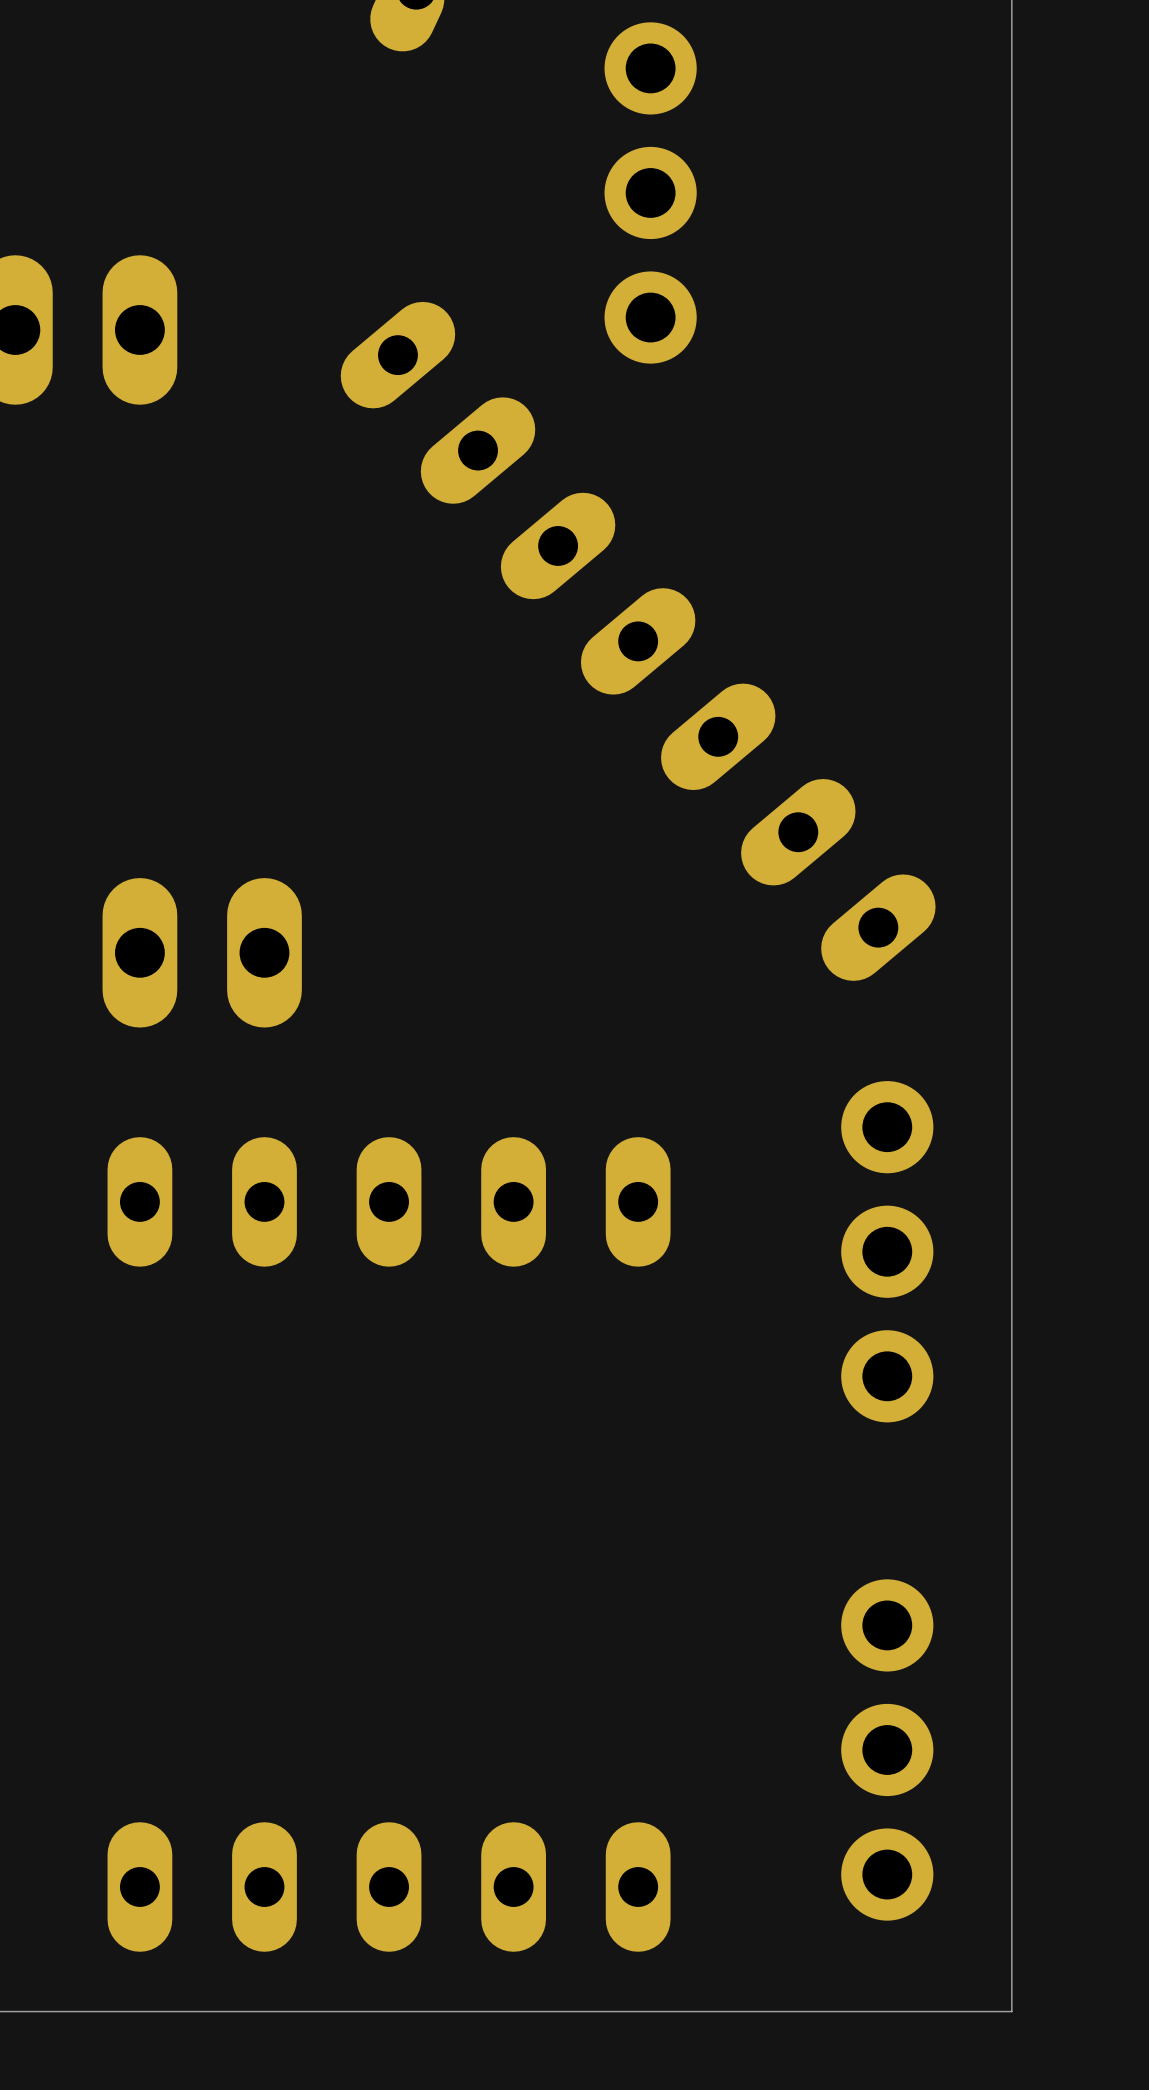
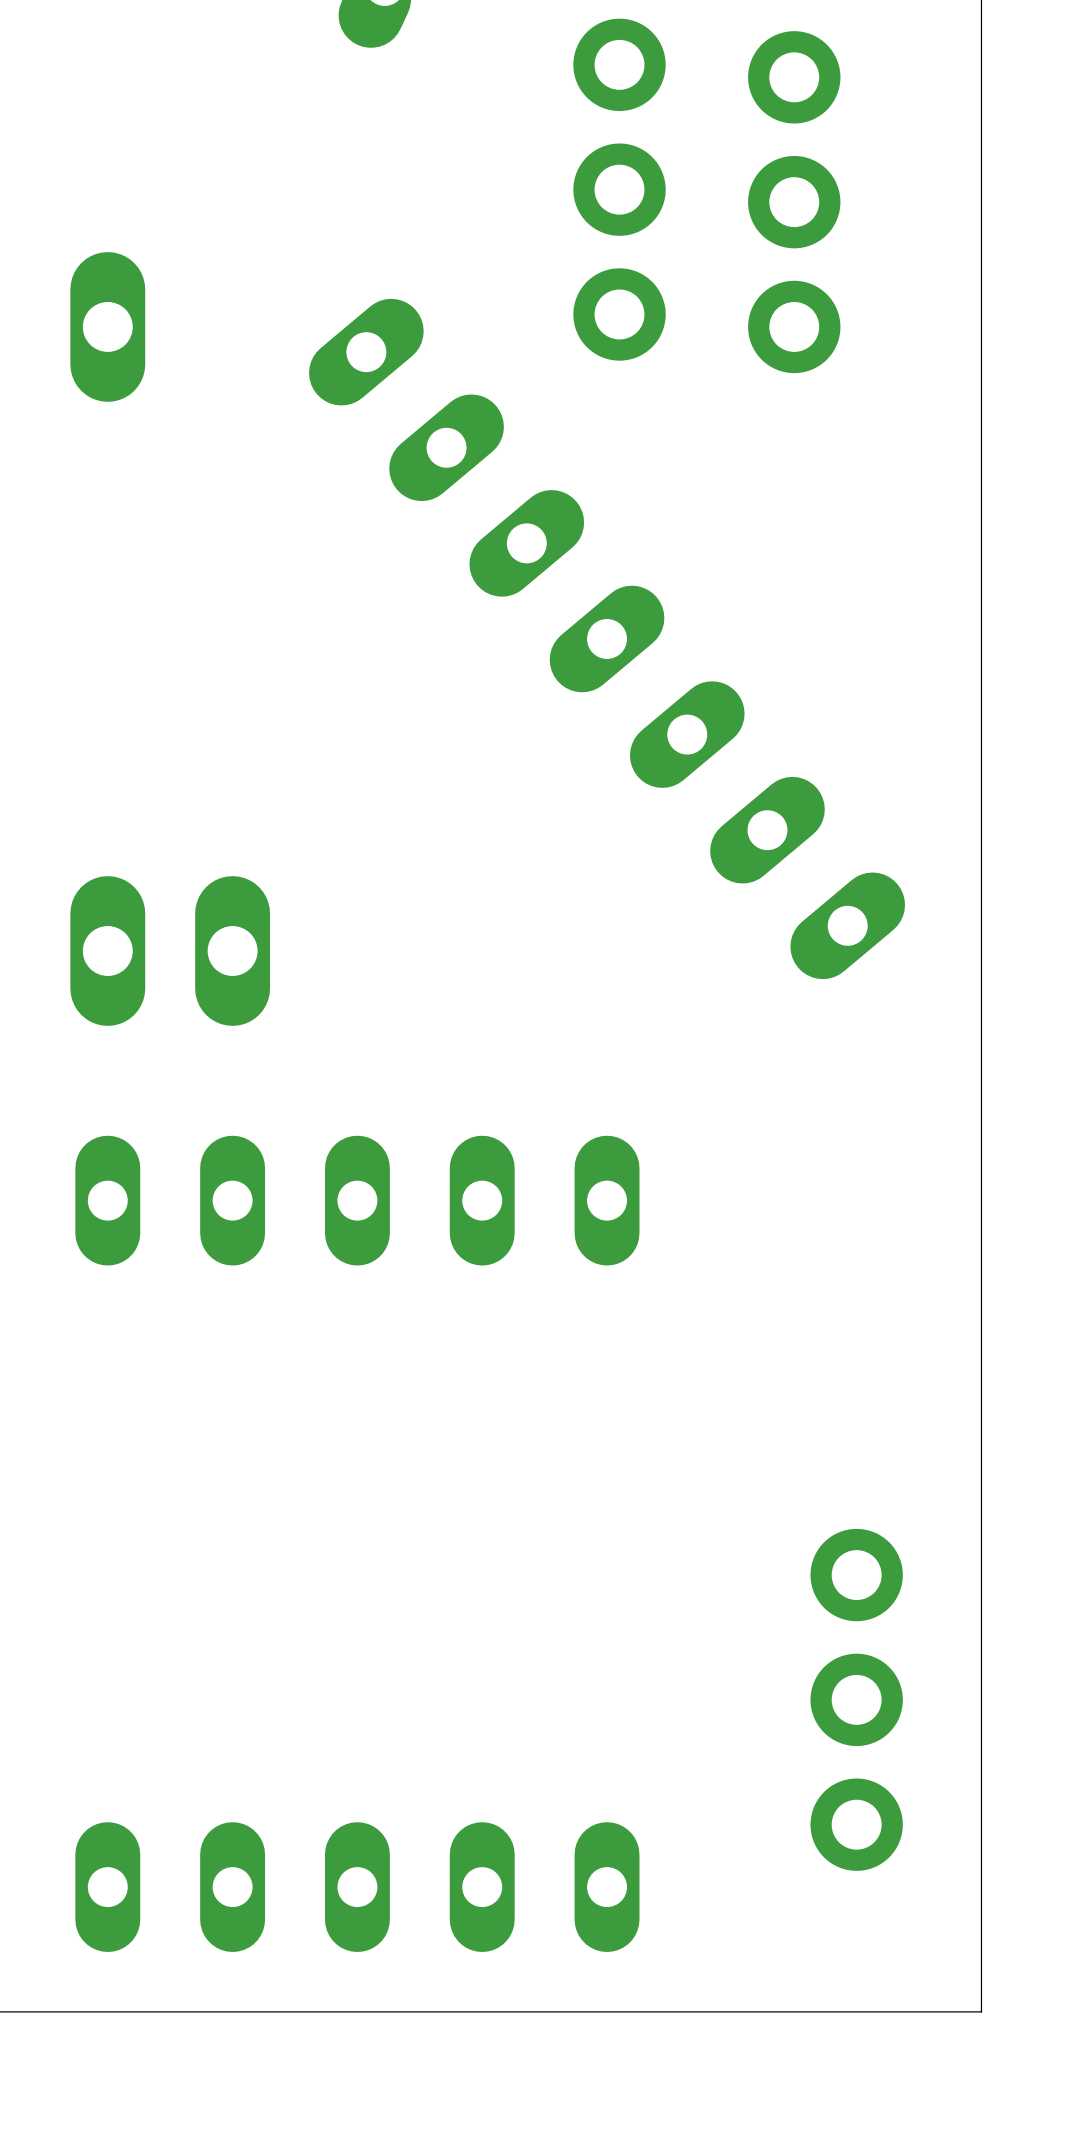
part: none -> (794, 202)
part: (887, 1251) -> none
part position: (887, 1749) -> (856, 1699)

